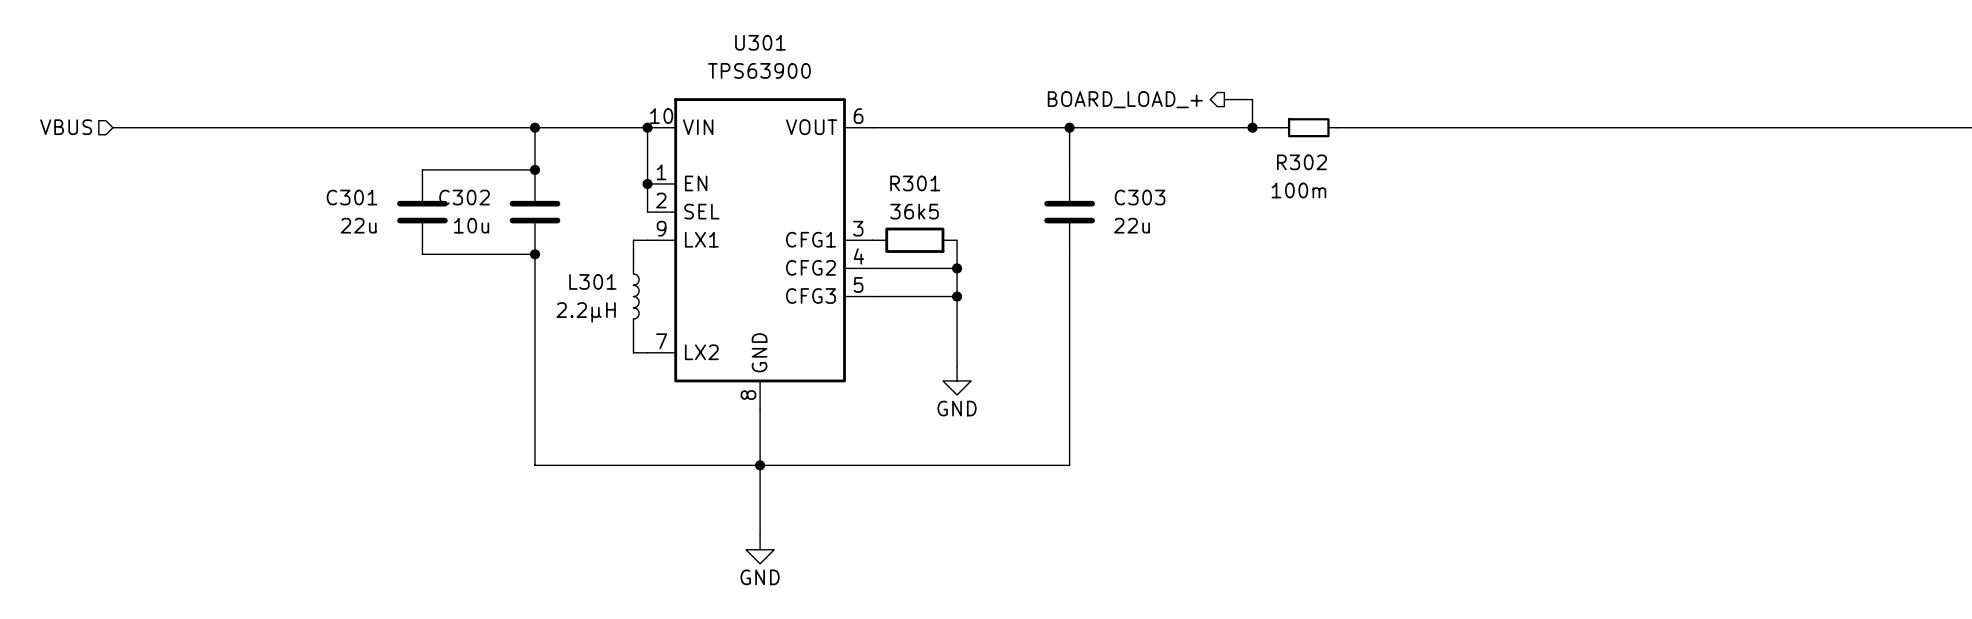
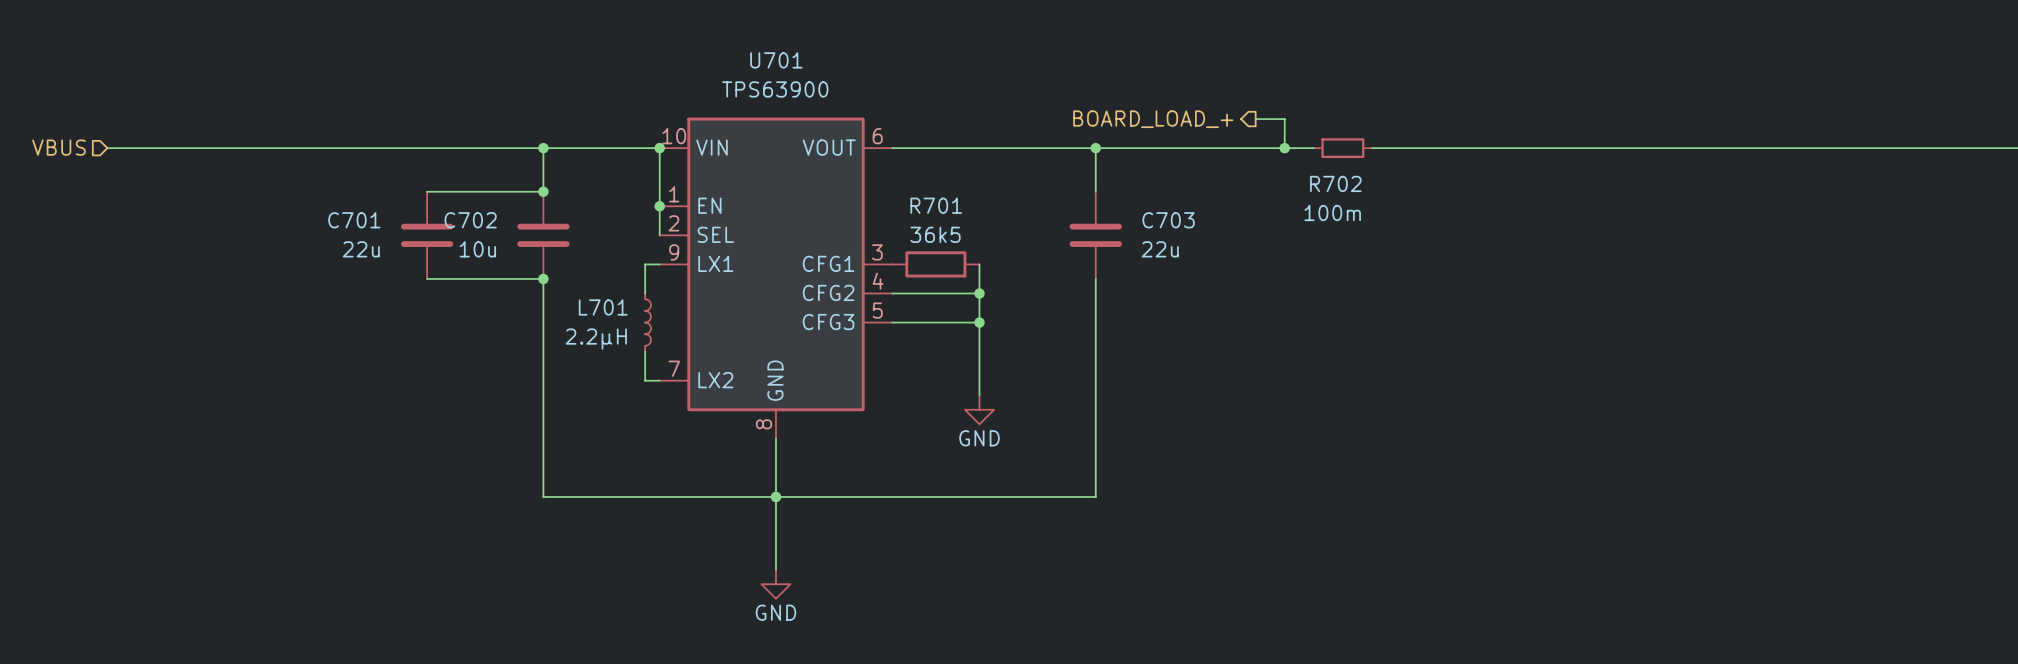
U301 name: U301 (760, 42) -> U701 (776, 60)
R302 name: R302 (1301, 162) -> R702 (1335, 183)
R301 name: R301 (915, 183) -> R701 (936, 205)
C301 name: C301 (351, 197) -> C701 (354, 220)
C302 name: C302 (464, 197) -> C702 (470, 220)
C303 name: C303 (1140, 197) -> C703 (1168, 220)
L301 name: L301 (592, 281) -> L701 (603, 307)

